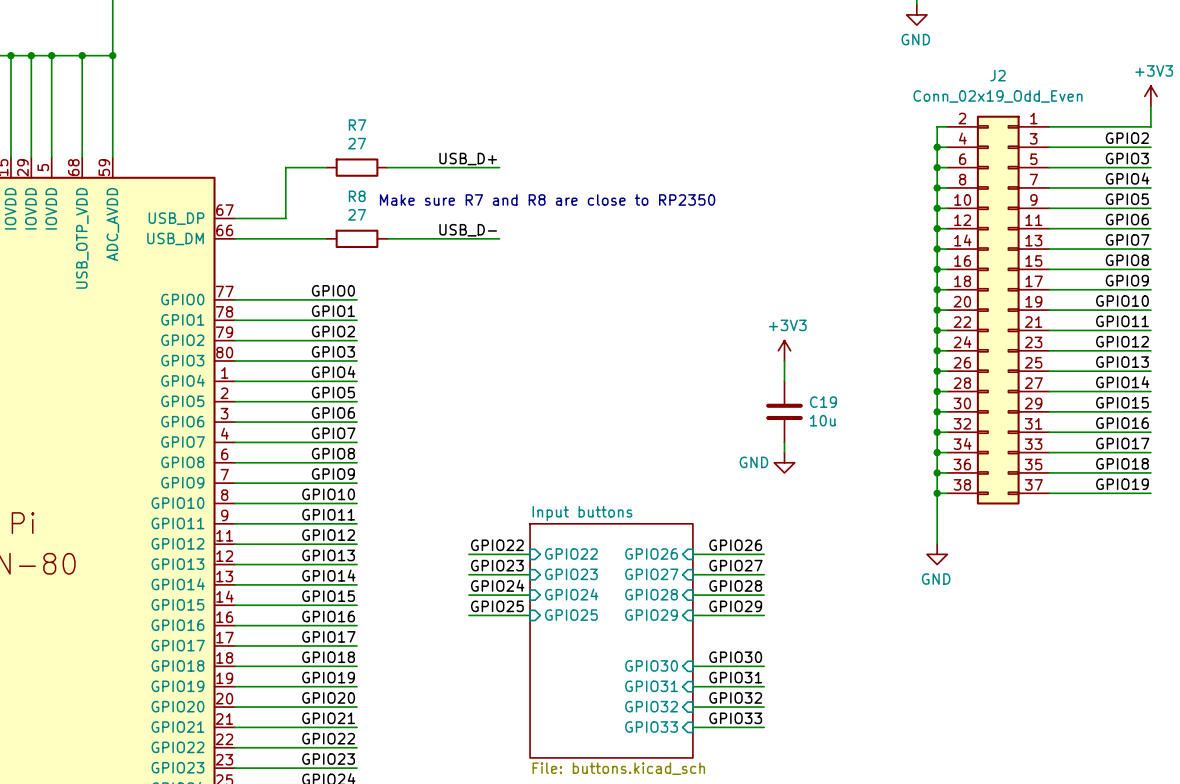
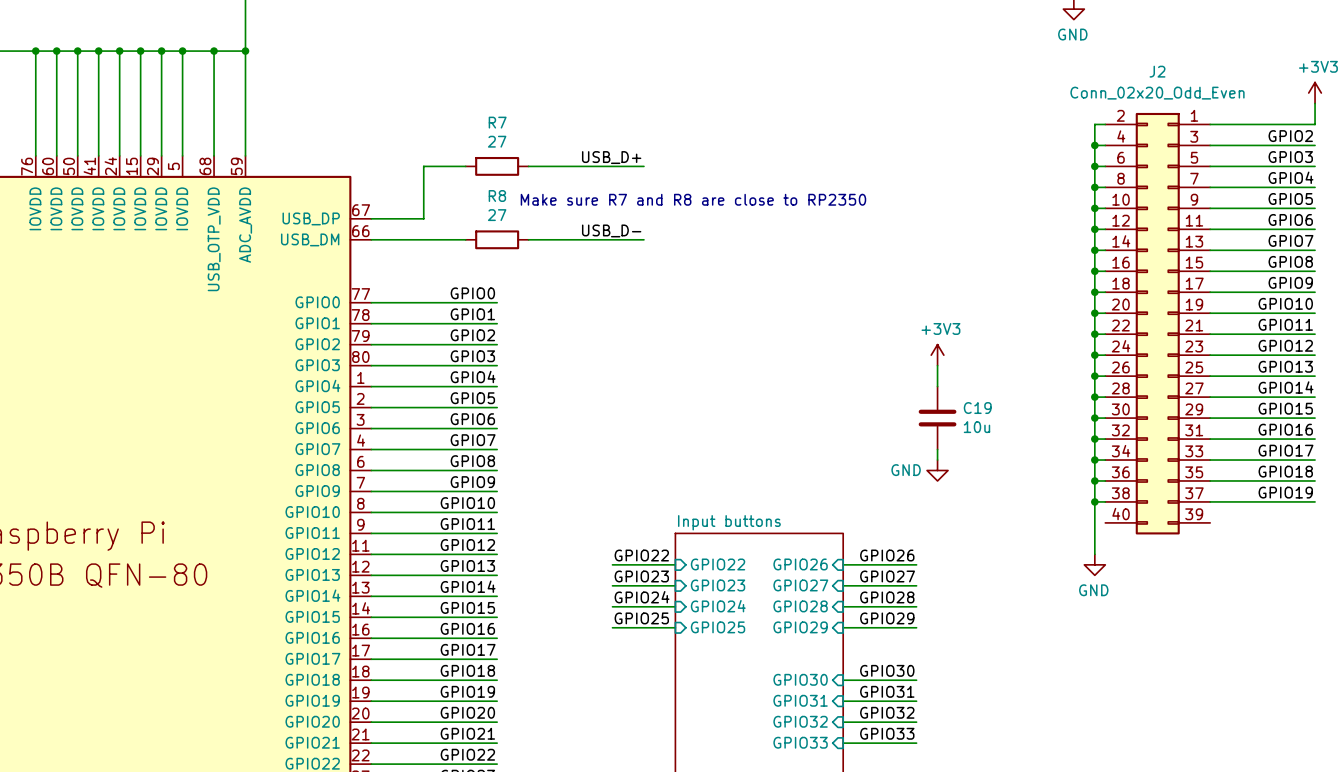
J2 value: Conn_02x19_Odd_Even (997, 96) -> Conn_02x20_Odd_Even (1157, 93)
J2 symbol: [947, 115, 1050, 505] -> [1105, 112, 1211, 535]

